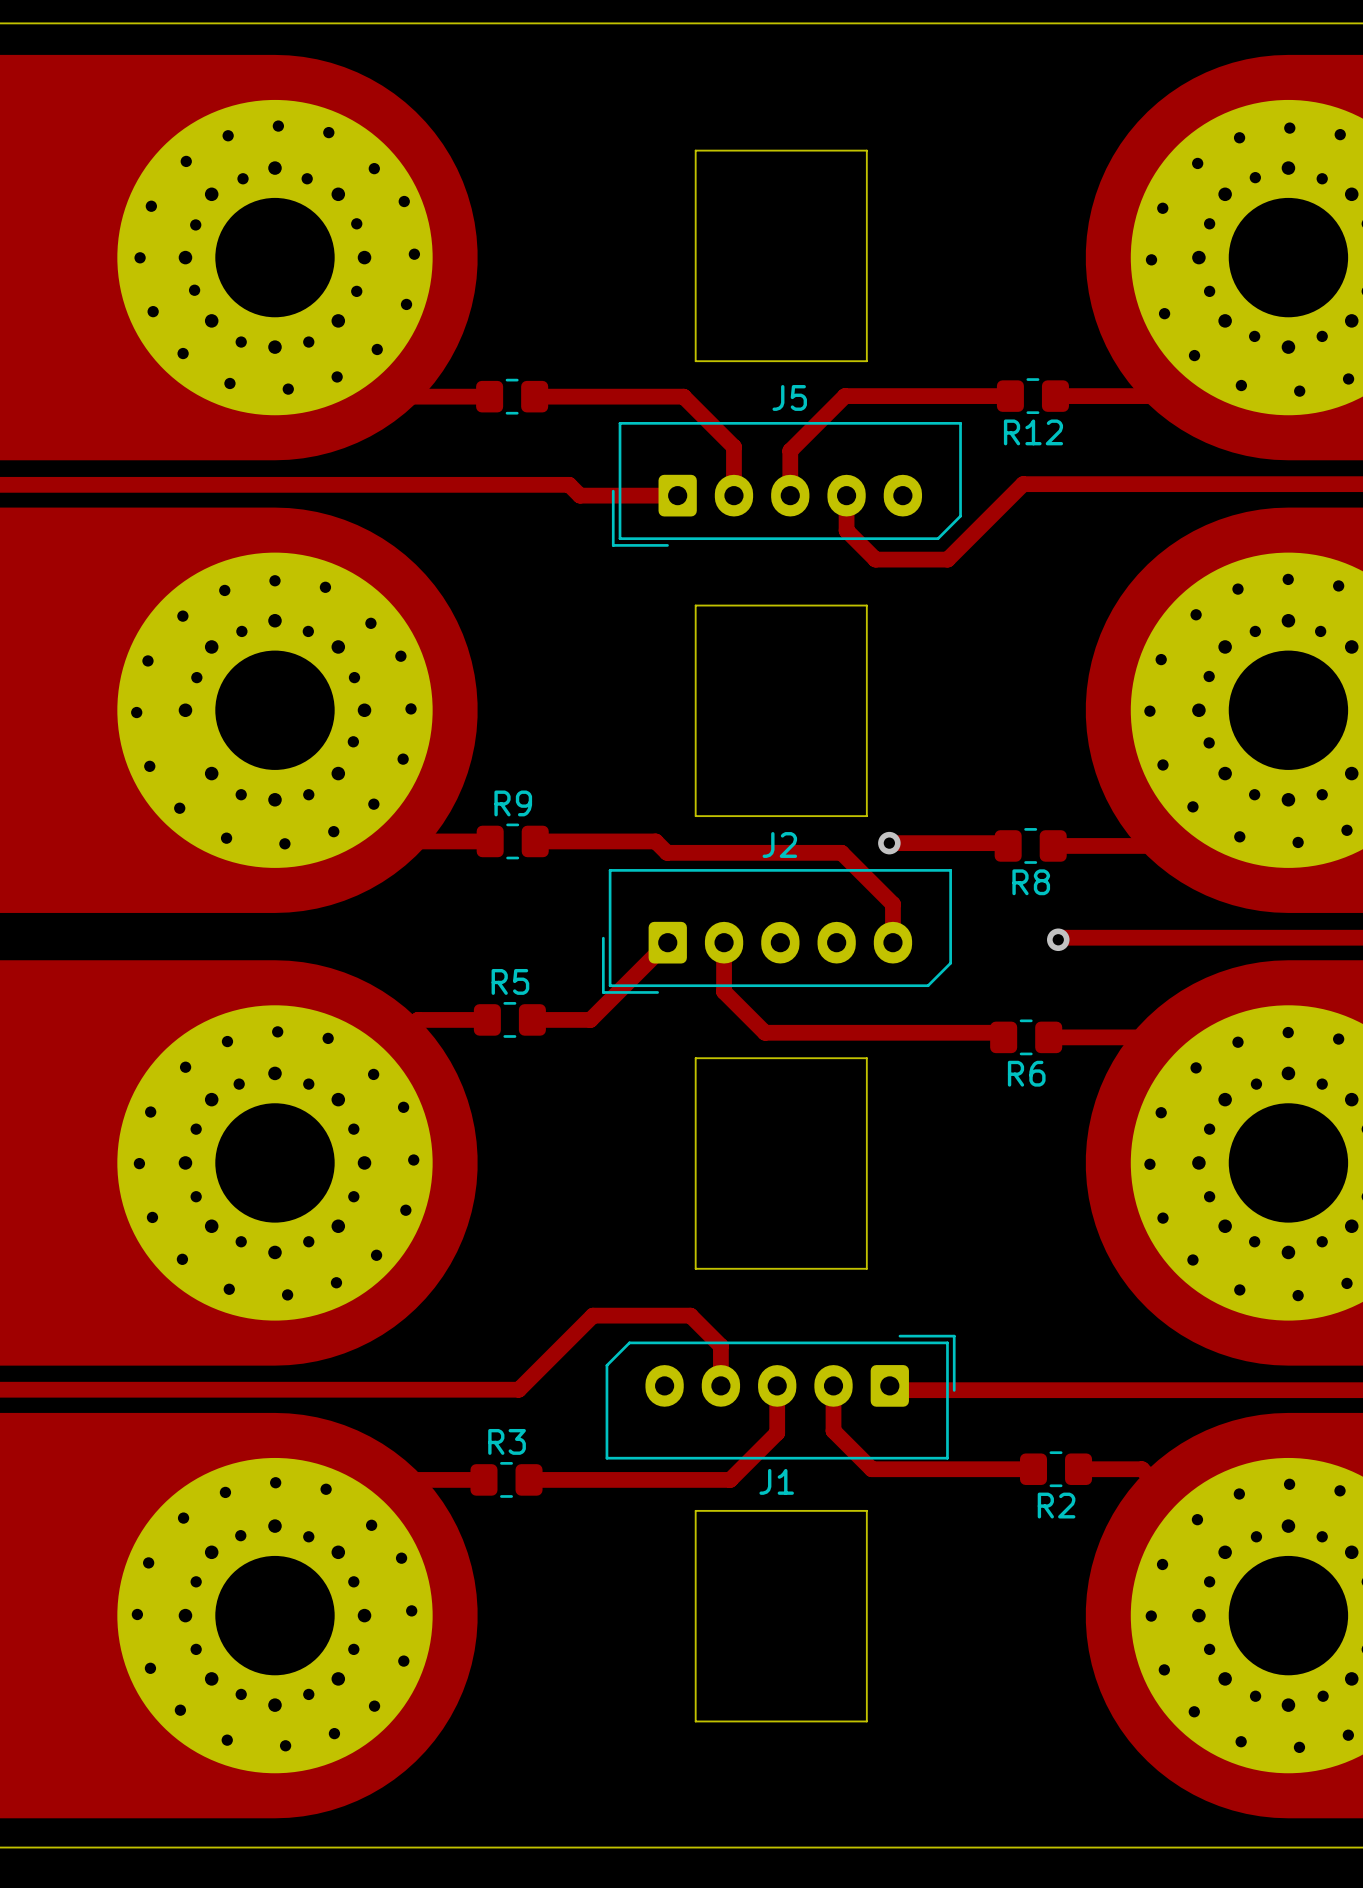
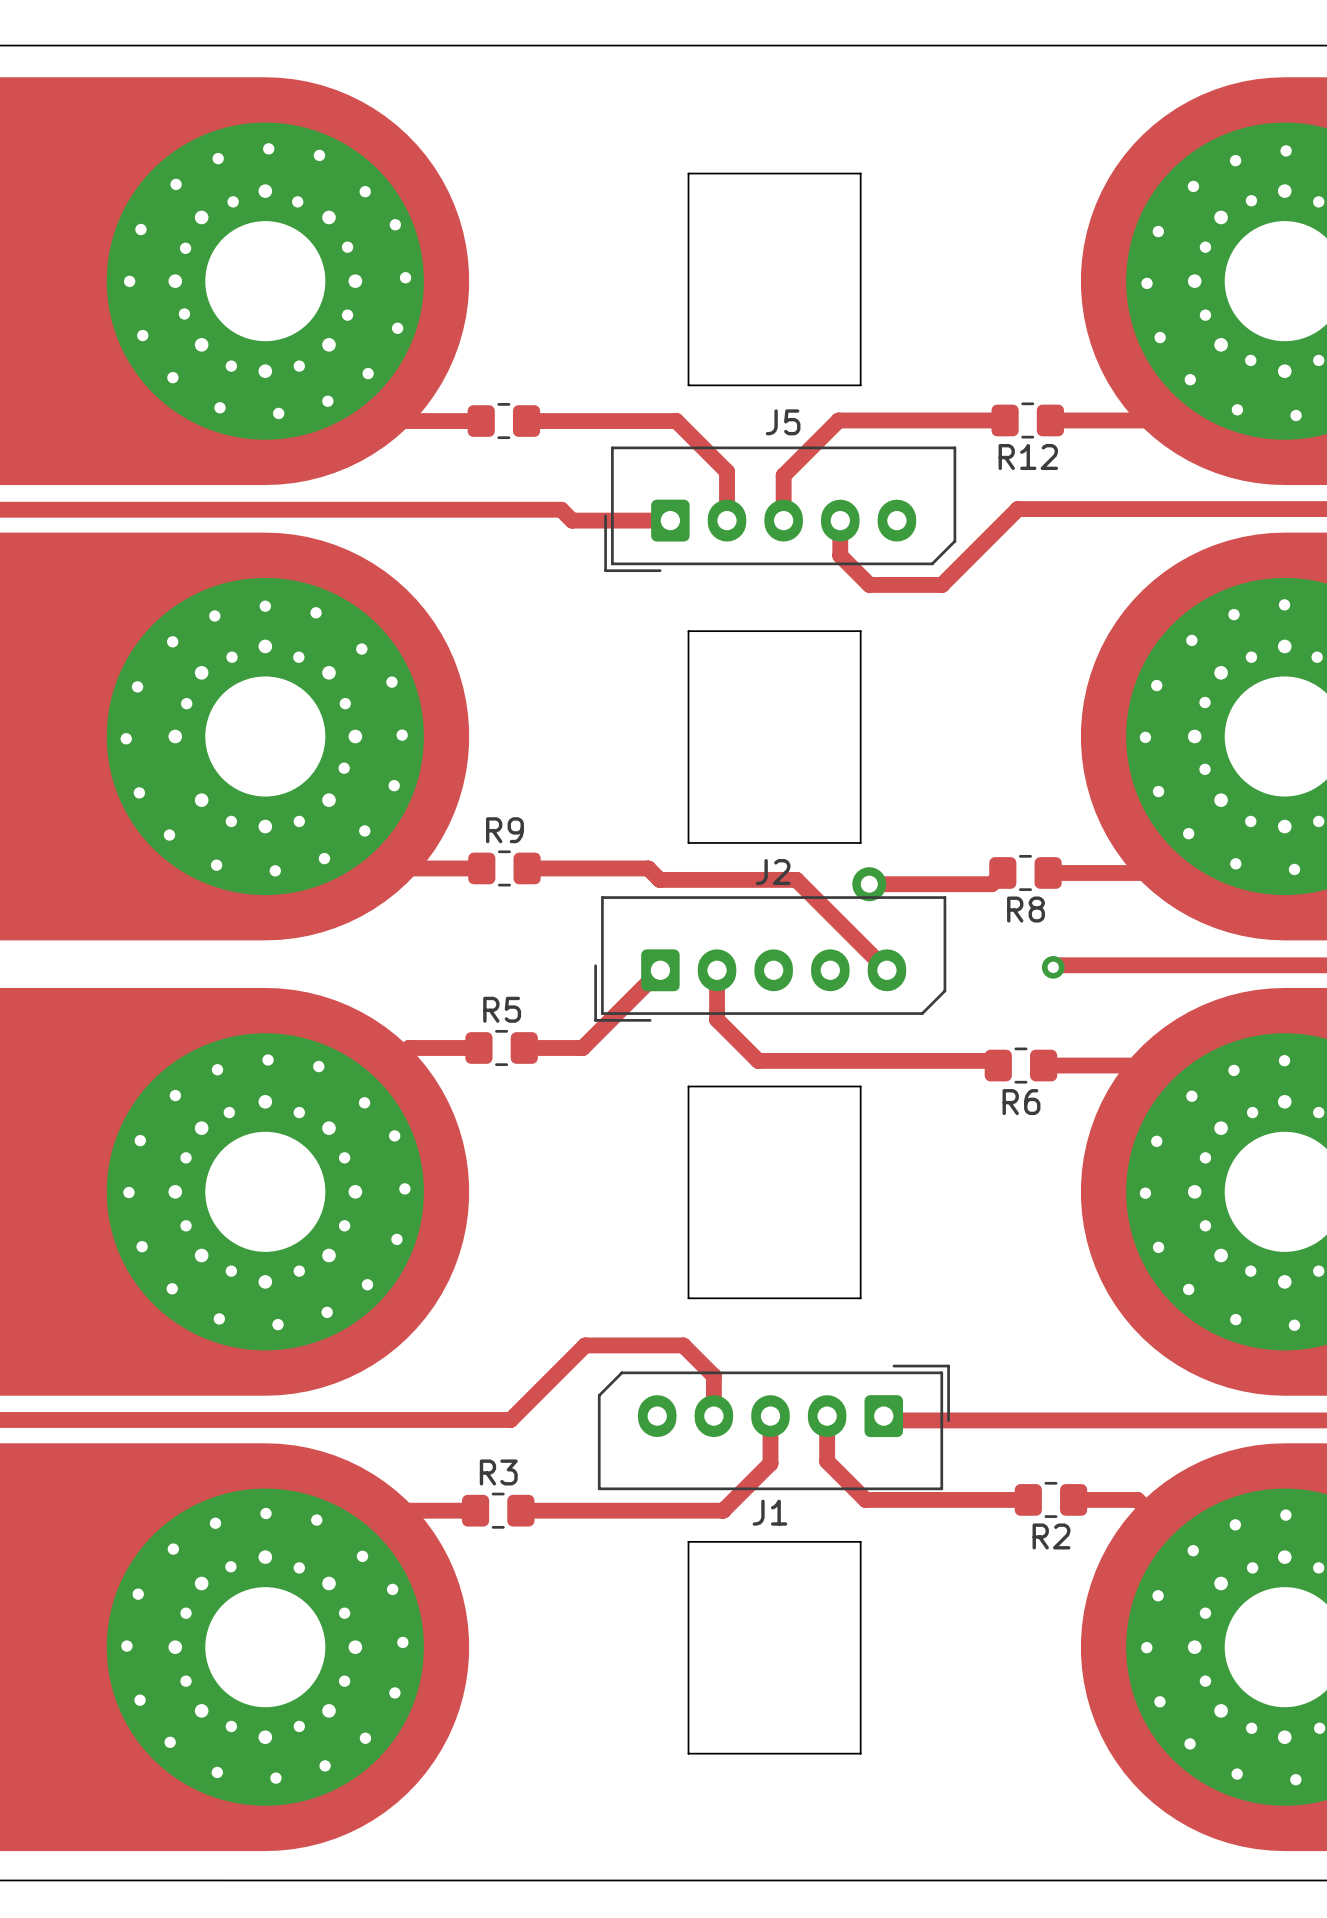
via size: [878, 831, 901, 855] -> [852, 867, 887, 902]
track: (889, 843) (1005, 843) (1008, 845) -> (869, 884) (991, 884) (1002, 872)
track: (803, 852) (841, 852) (892, 904) (892, 942) -> (796, 879) (886, 970)

